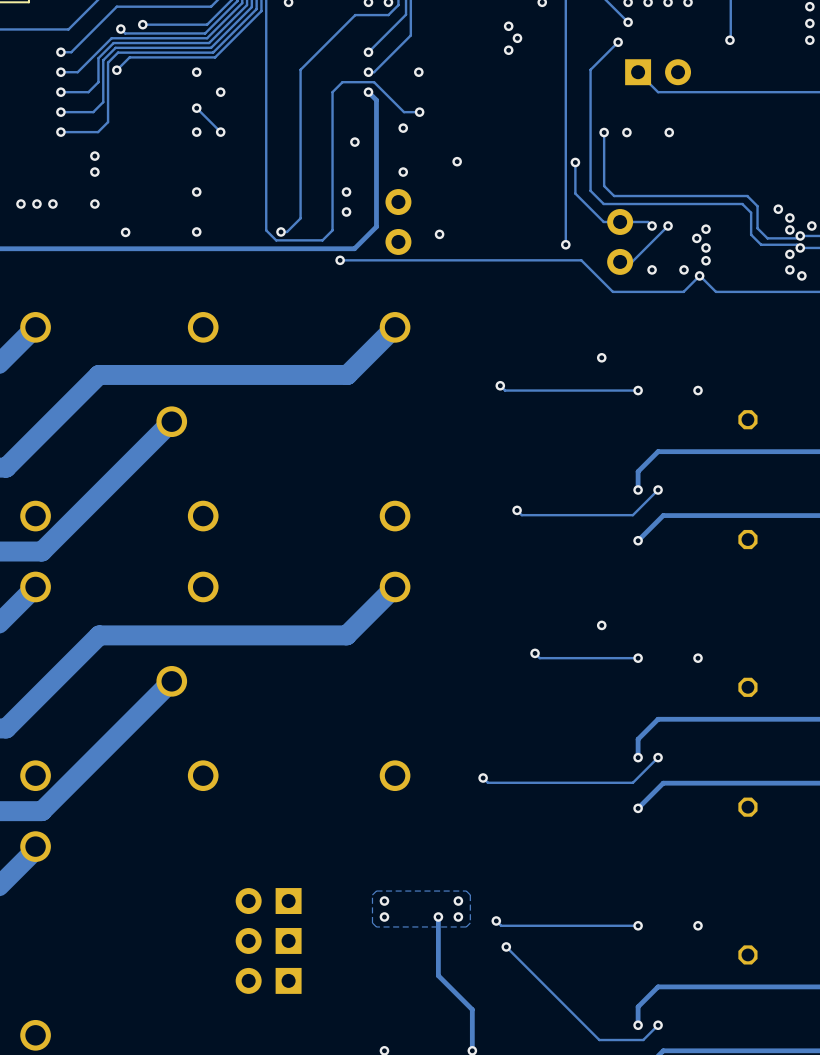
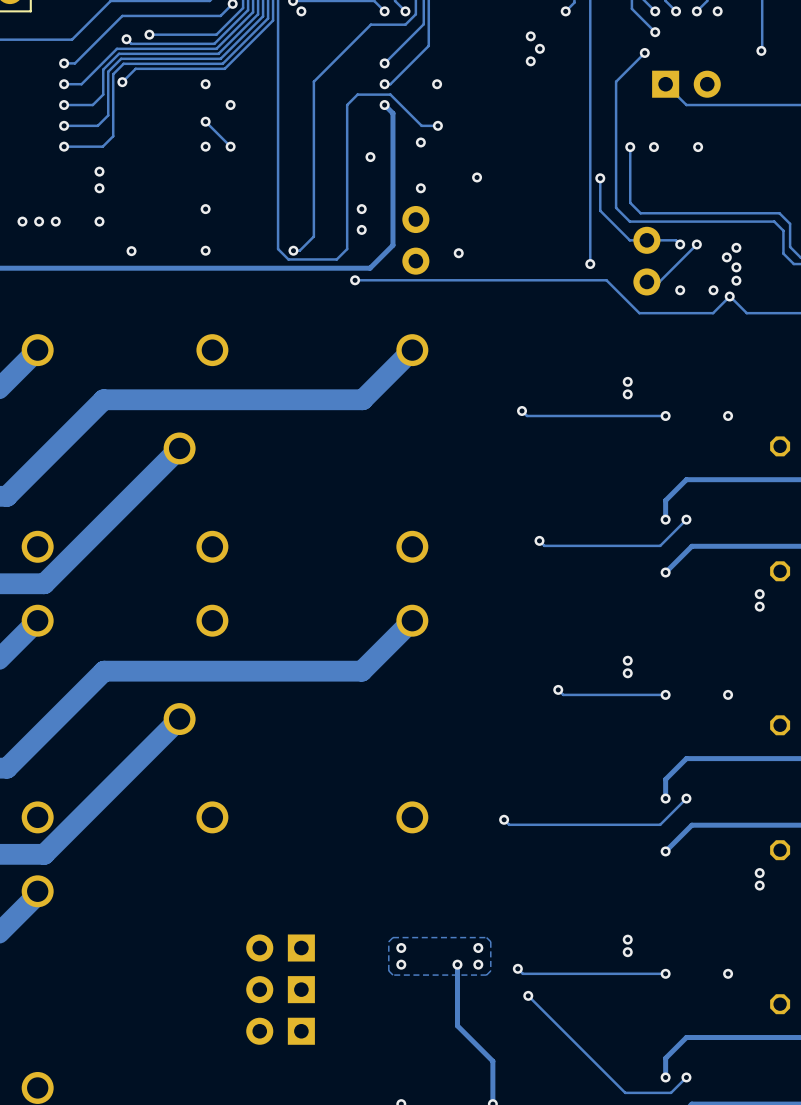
via: none -> (627, 394)
via: none -> (759, 594)
via: none -> (759, 606)
via: none -> (627, 673)
via: none -> (759, 873)
via: none -> (759, 885)
via: none -> (627, 939)
via: none -> (627, 952)

